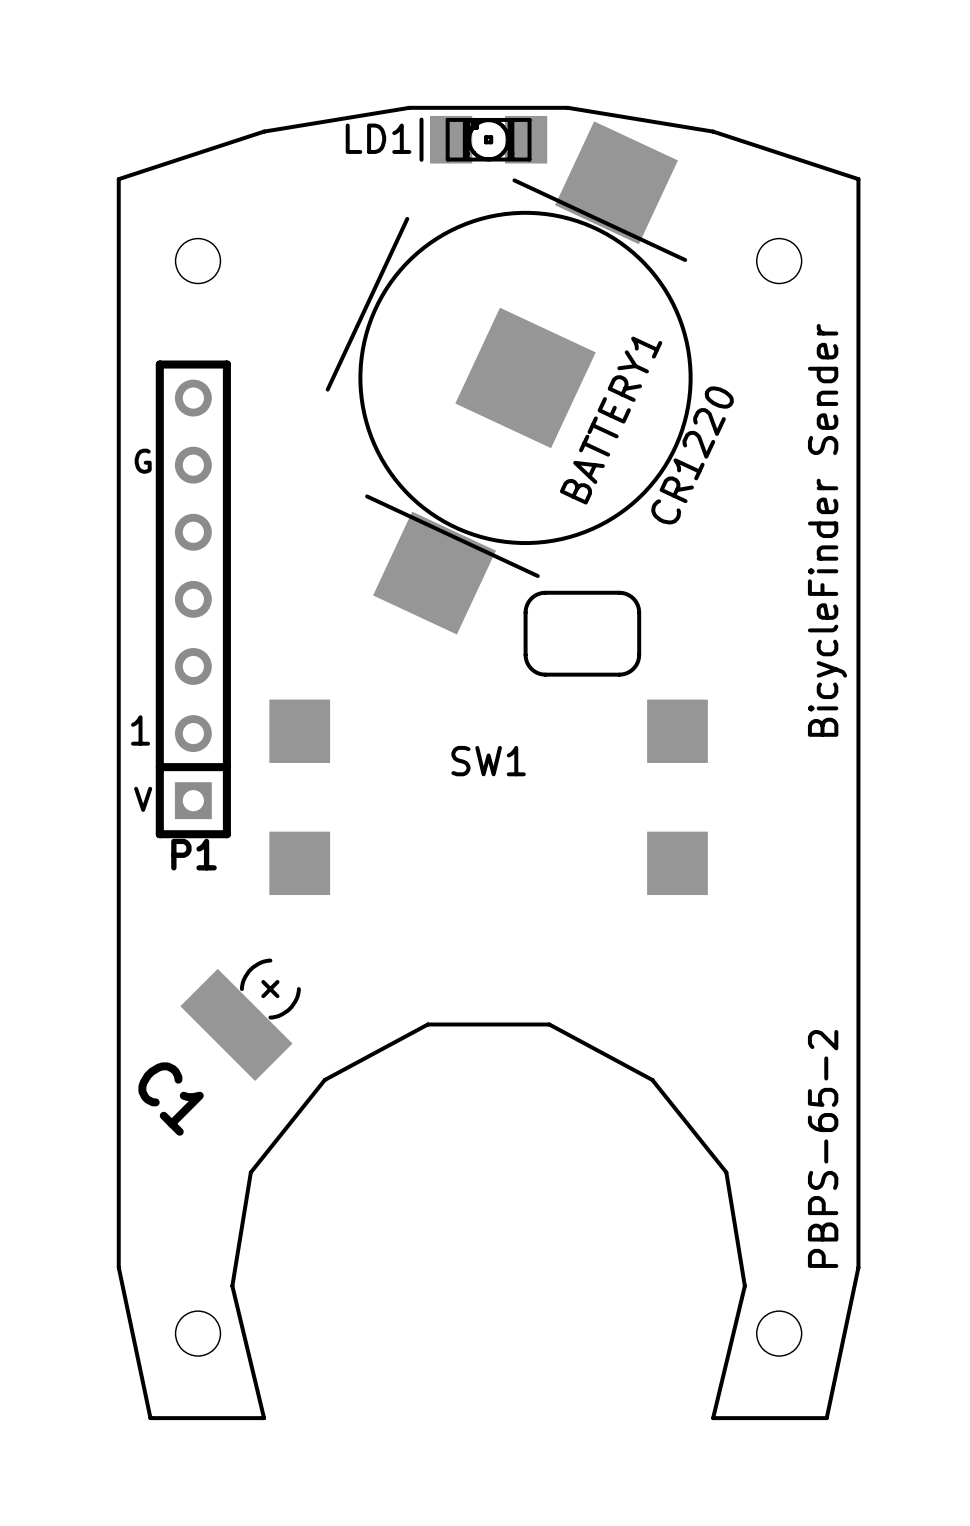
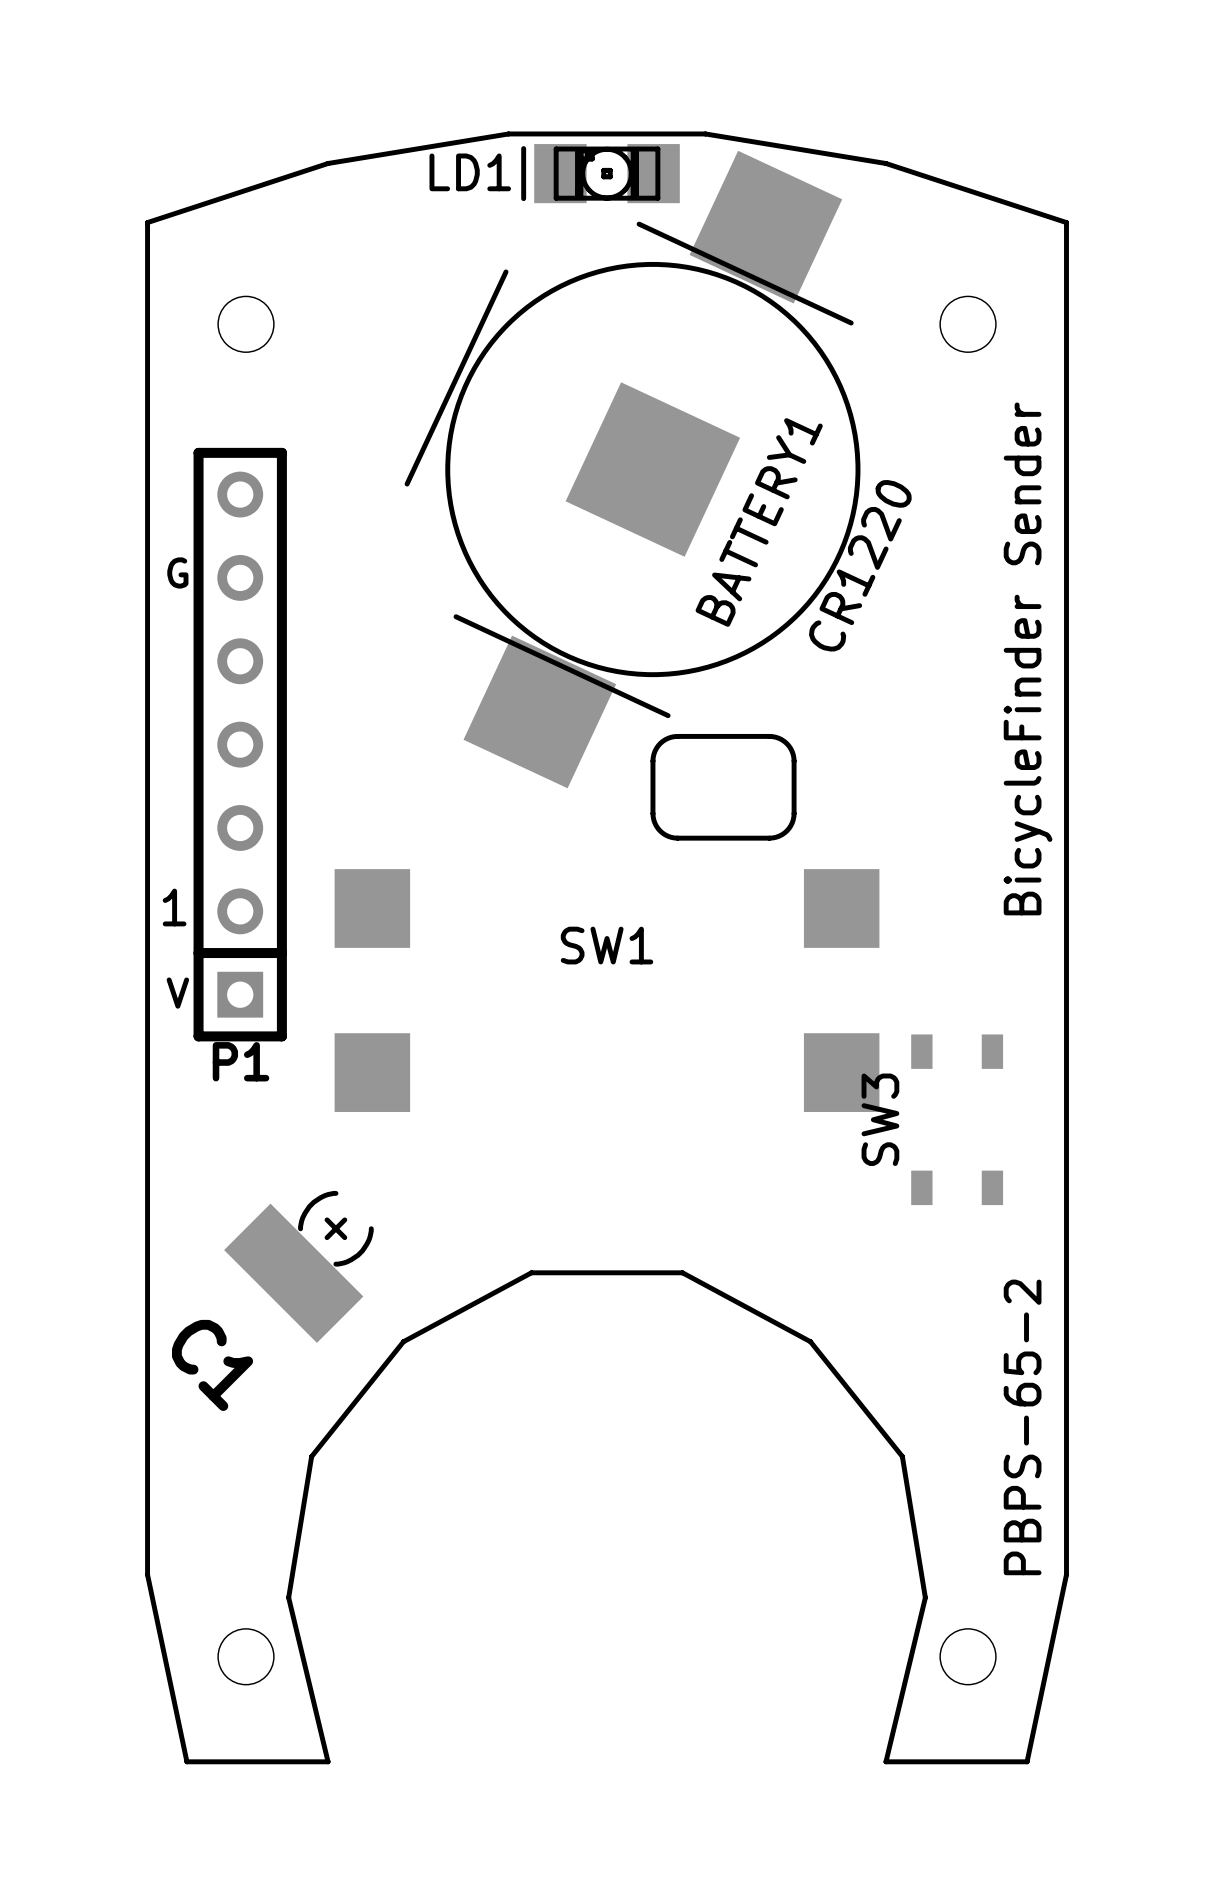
SW3: none -> (957, 1119)

